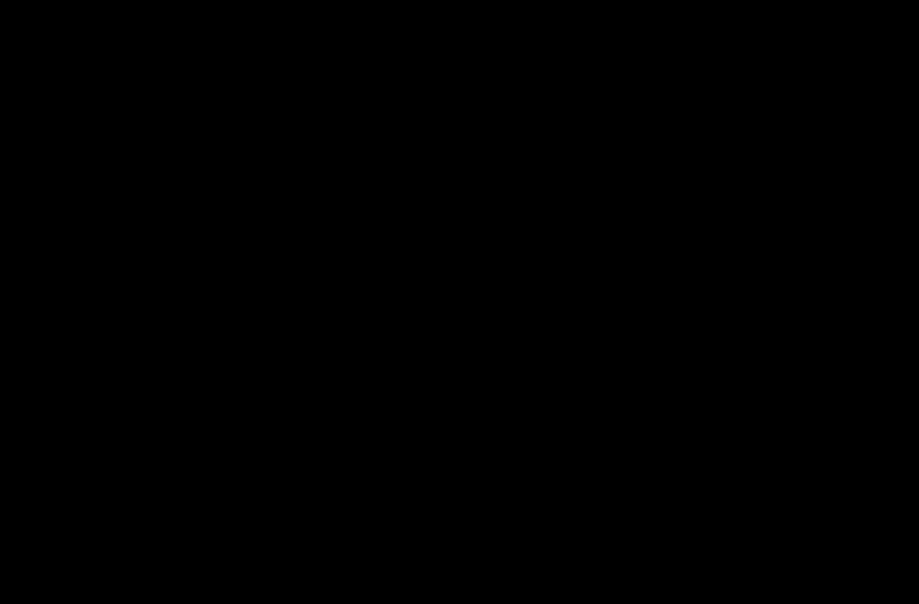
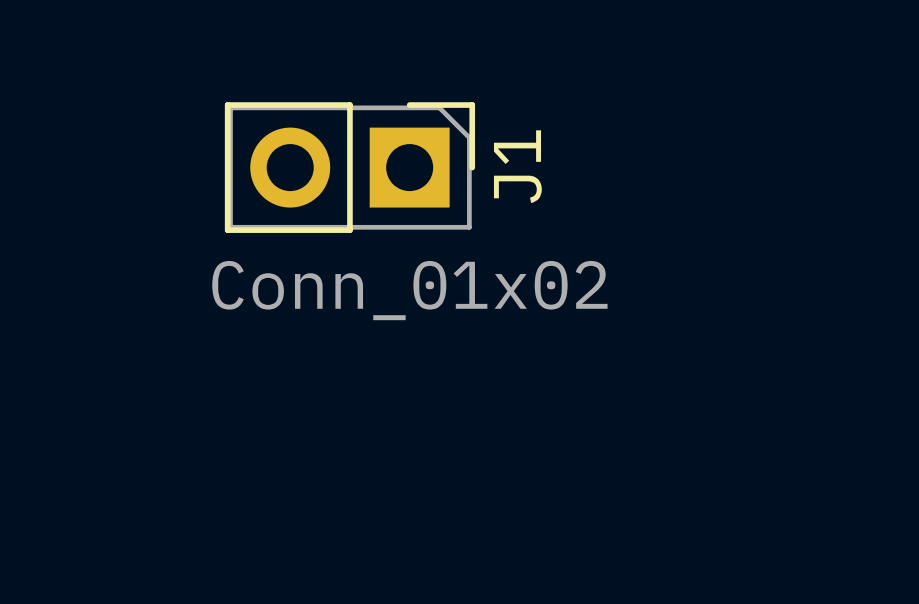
J1: none -> Conn_01x02 (349, 167)

